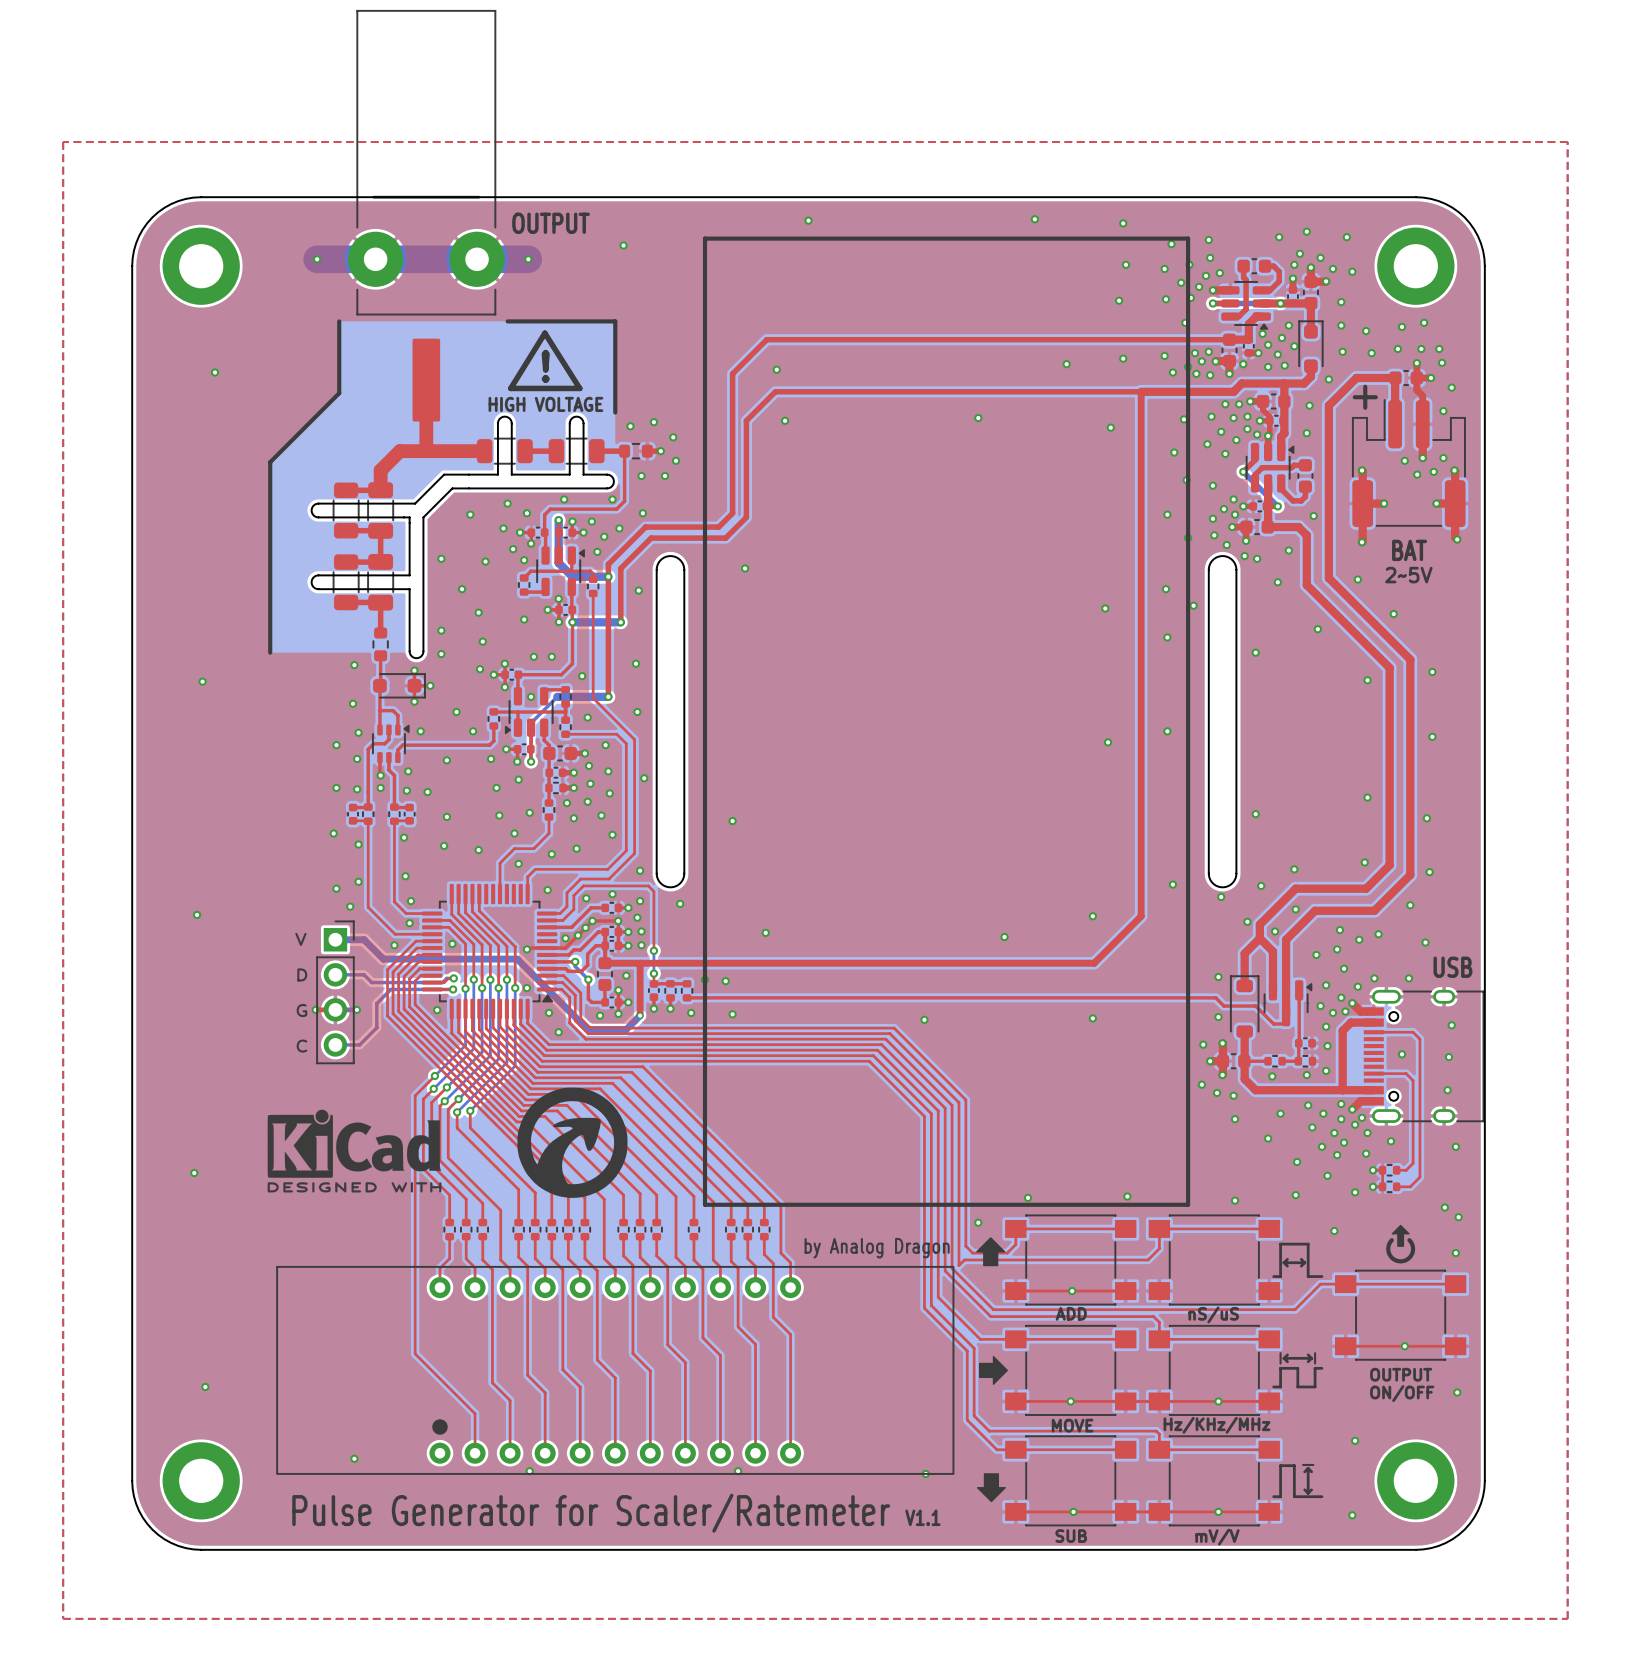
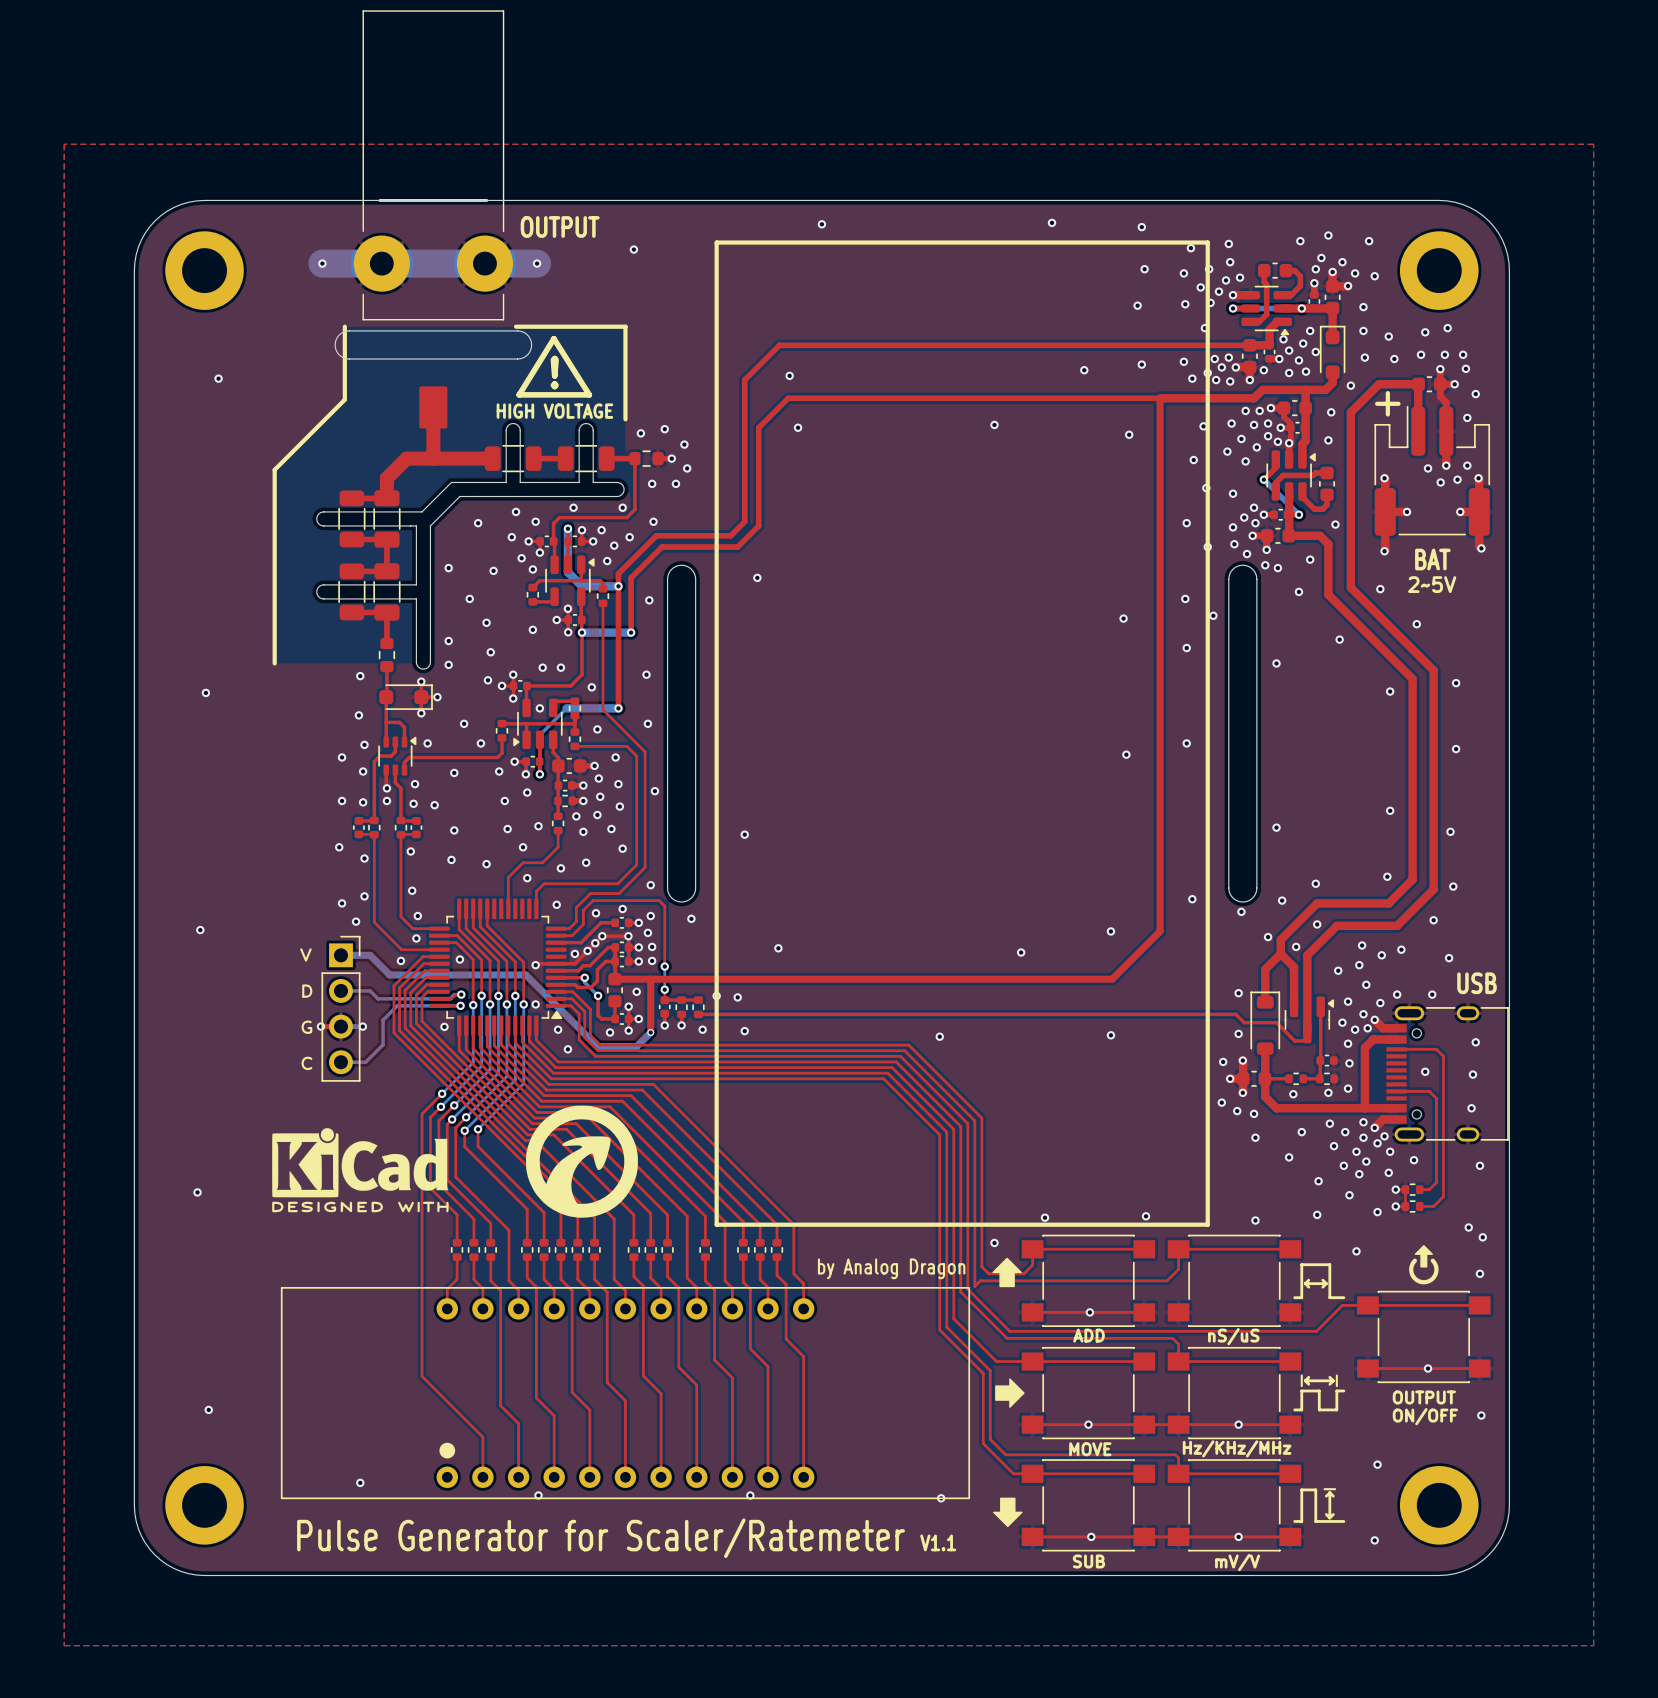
part footprint: [348, 10, 505, 422] -> [334, 10, 532, 429]

